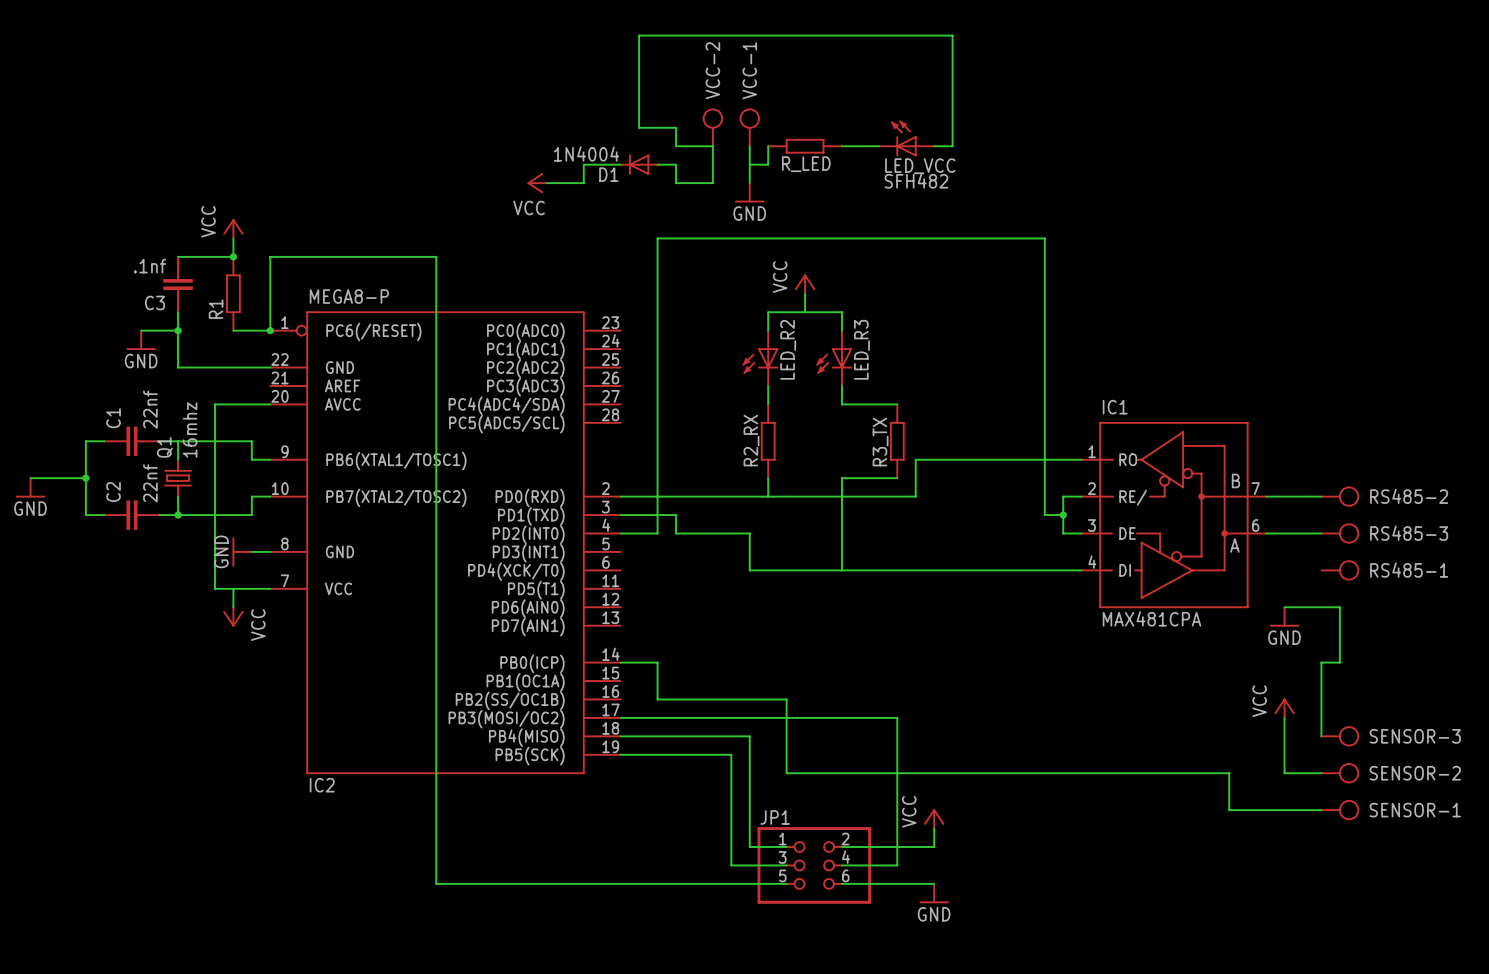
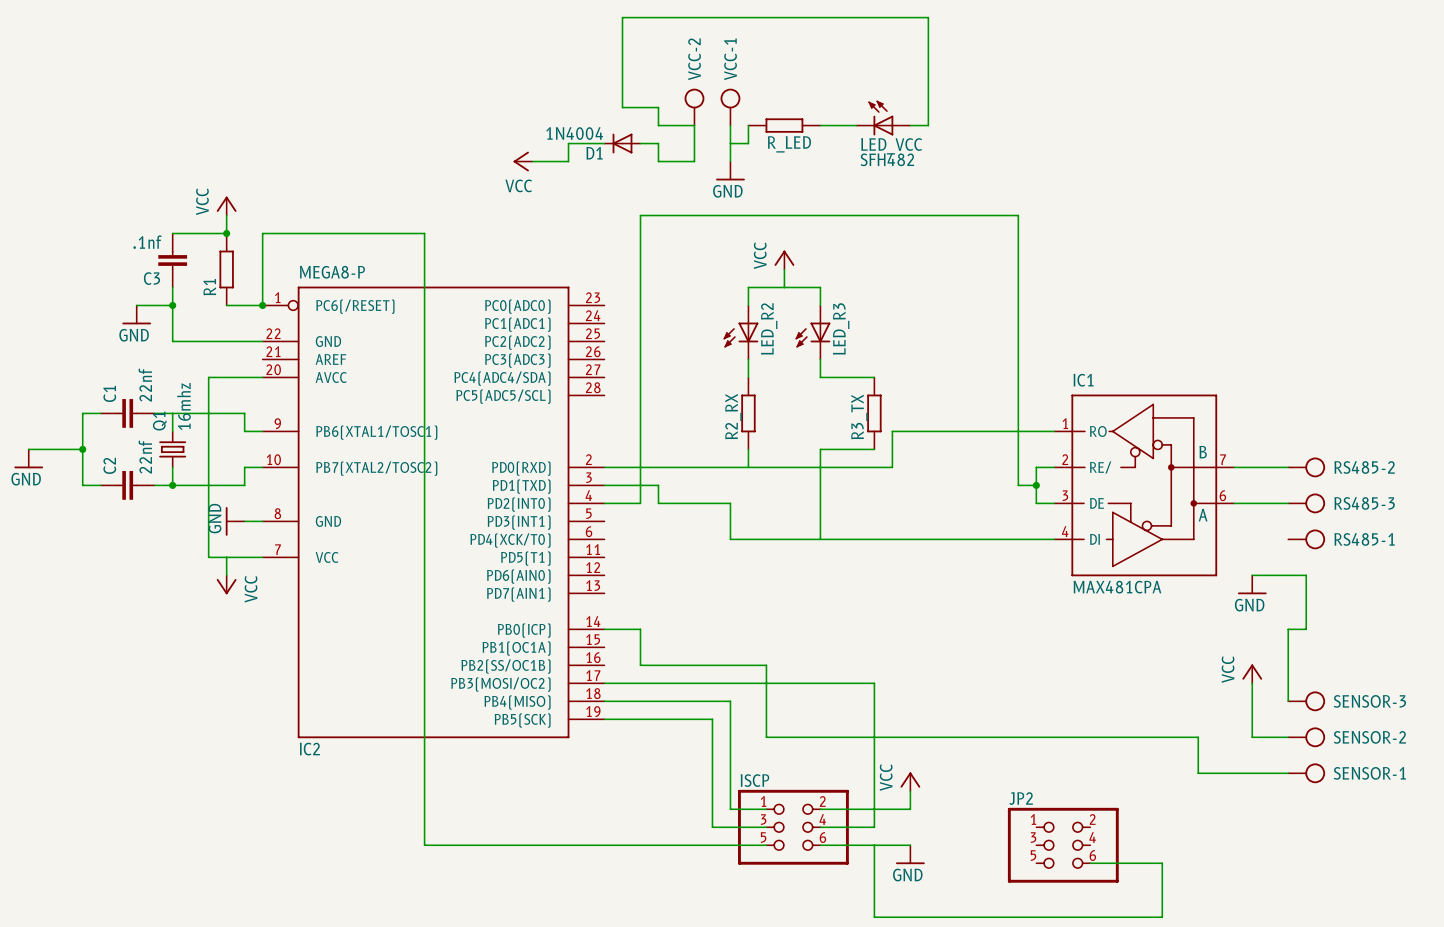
JP1 name: JP1 (775, 817) -> ISCP (754, 780)
wire: none -> (874, 845) (874, 917) (1162, 917) (1162, 863) (1090, 863)
JP2: none -> (1063, 845)

